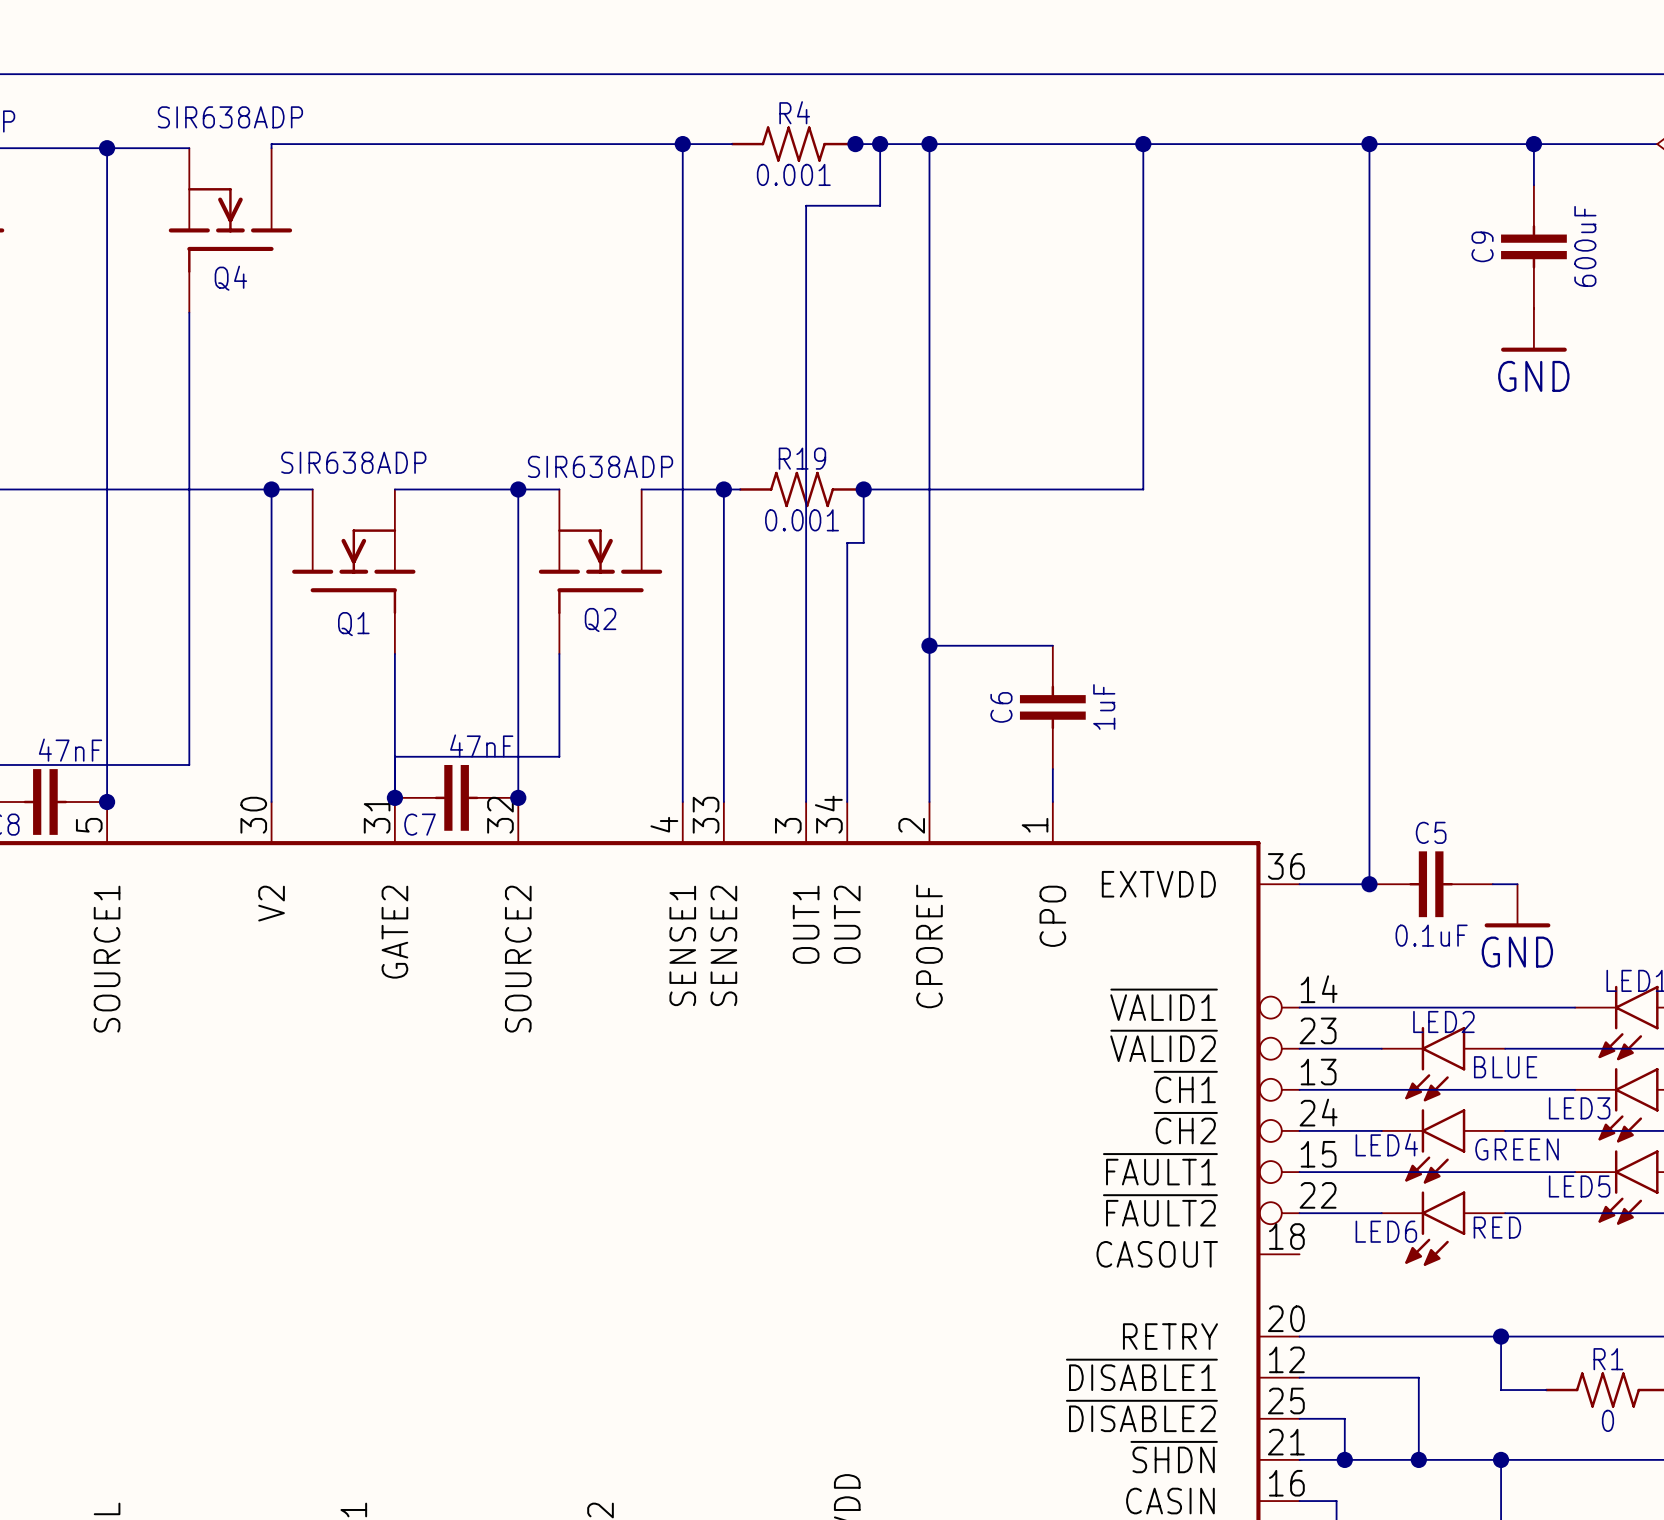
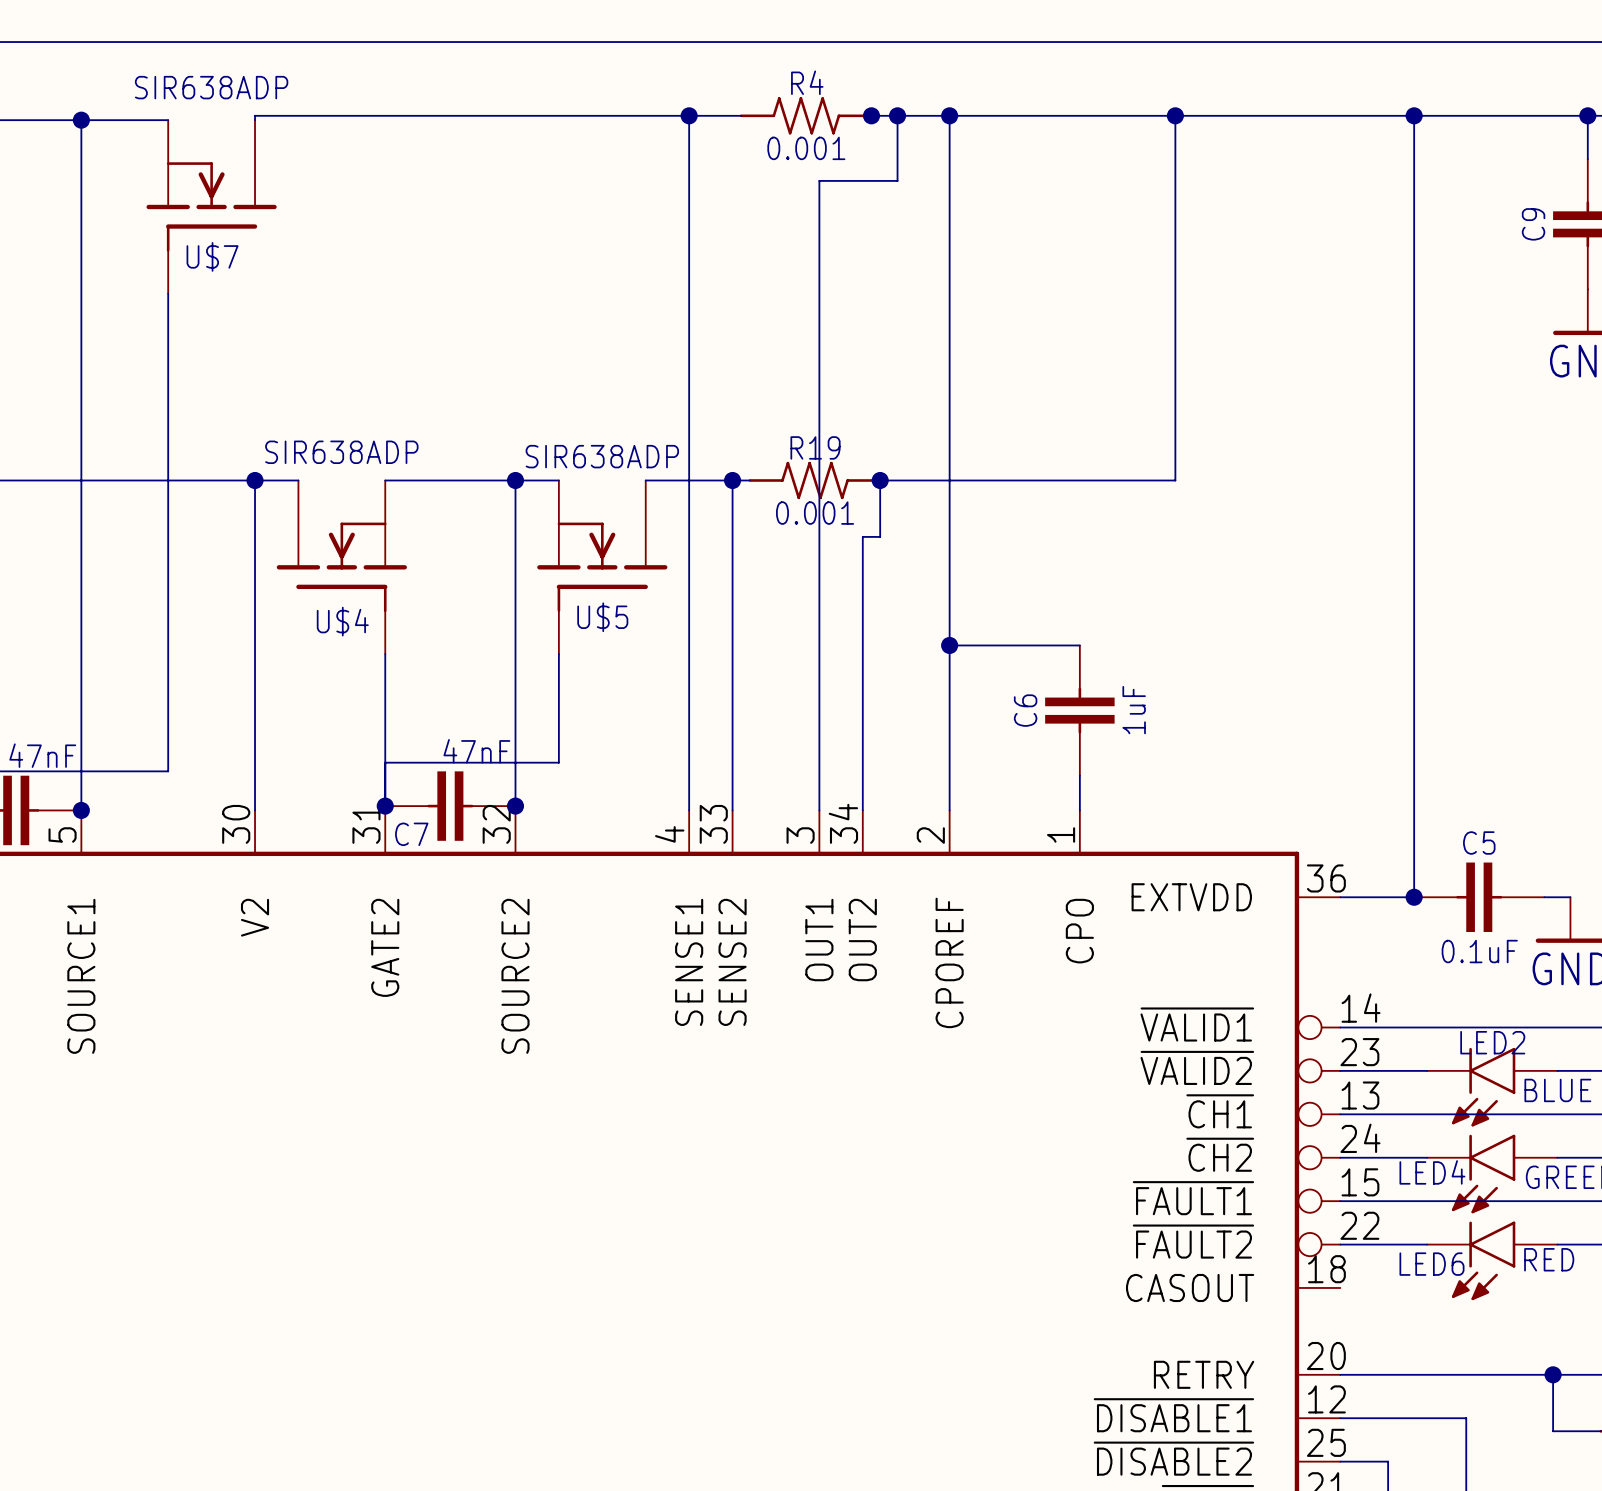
Q4 name: Q4 (230, 278) -> U$7 (212, 256)
Q2 name: Q2 (600, 619) -> U$5 (602, 617)
Q1 name: Q1 (353, 624) -> U$4 (342, 621)

